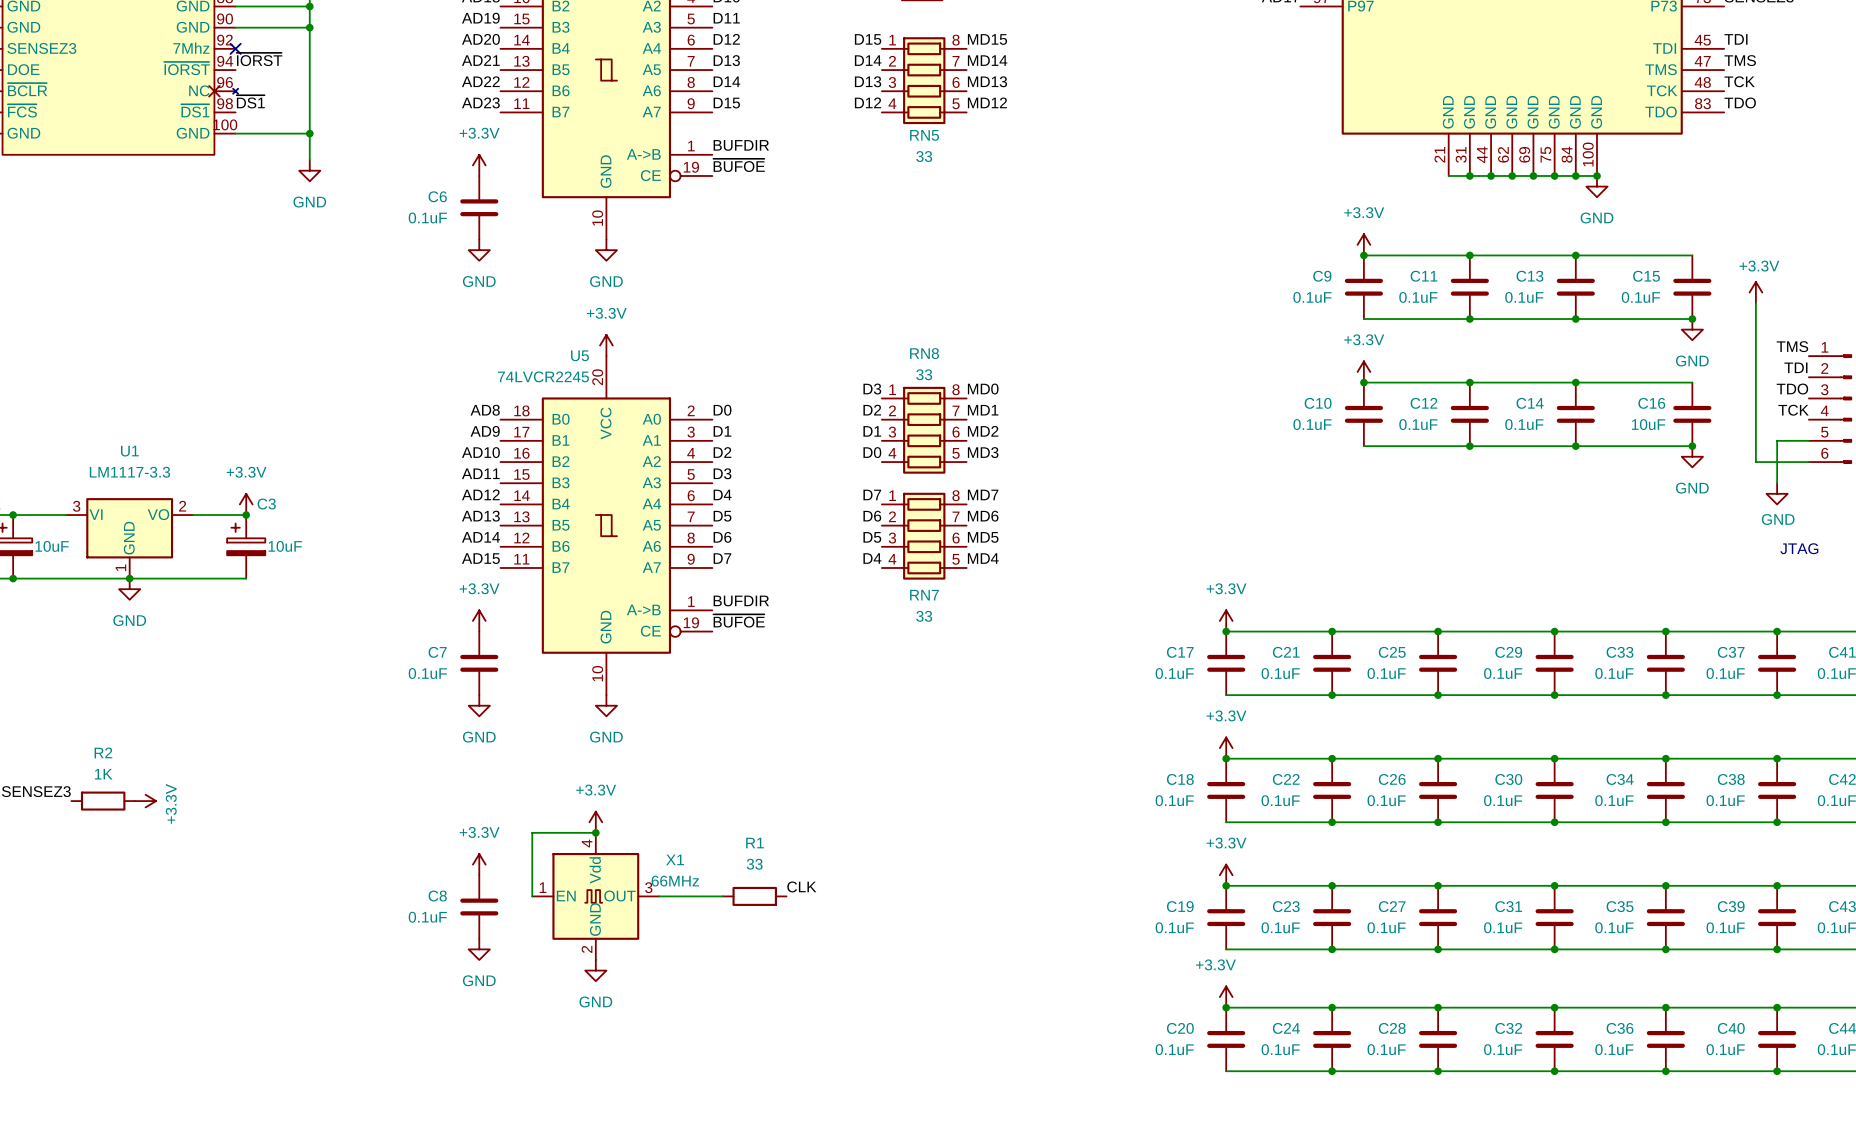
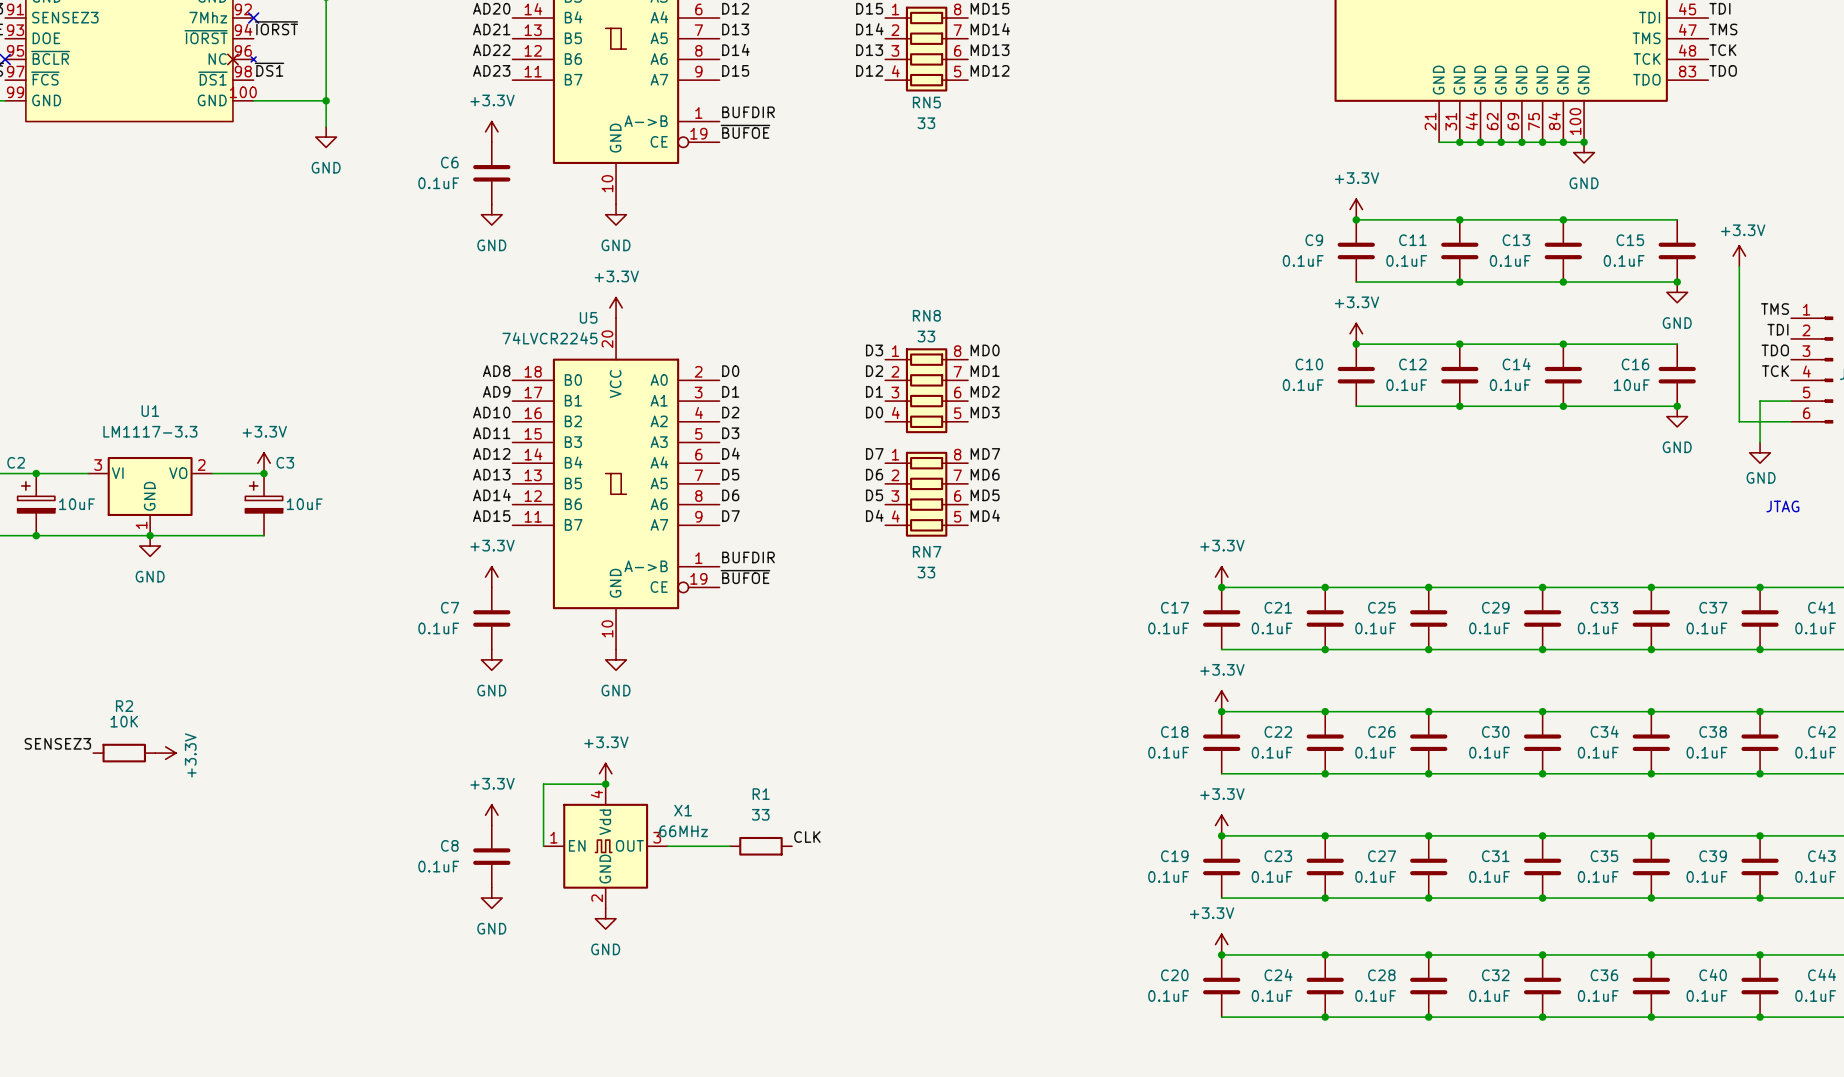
R2 value: 1K (103, 774) -> 10K (124, 721)

